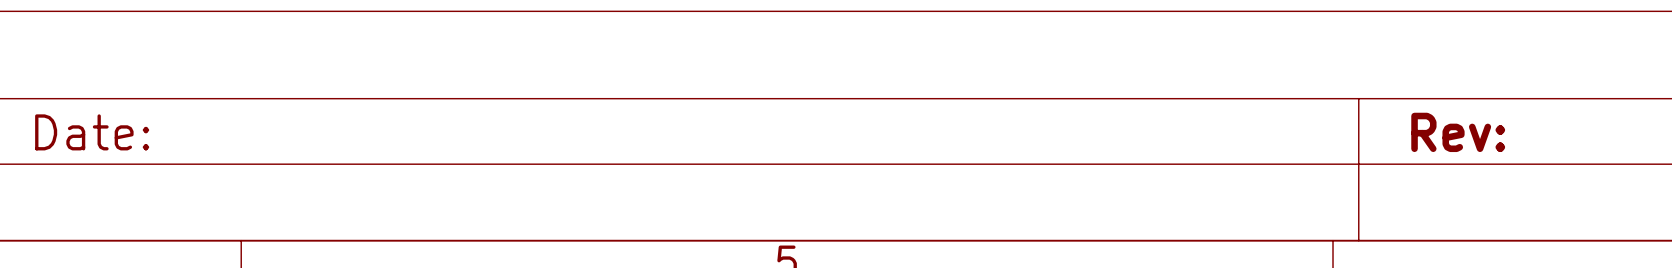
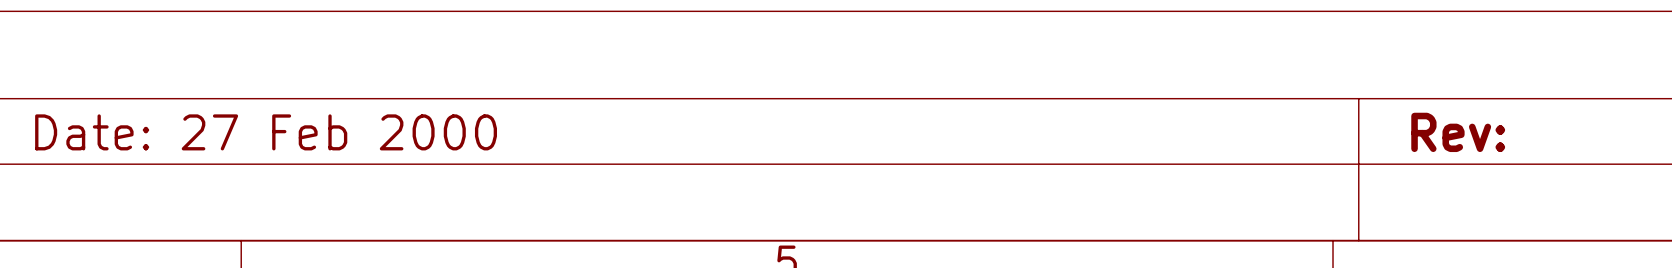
title block: Date: (92, 132) -> Date: 27 Feb 2000 (266, 132)

